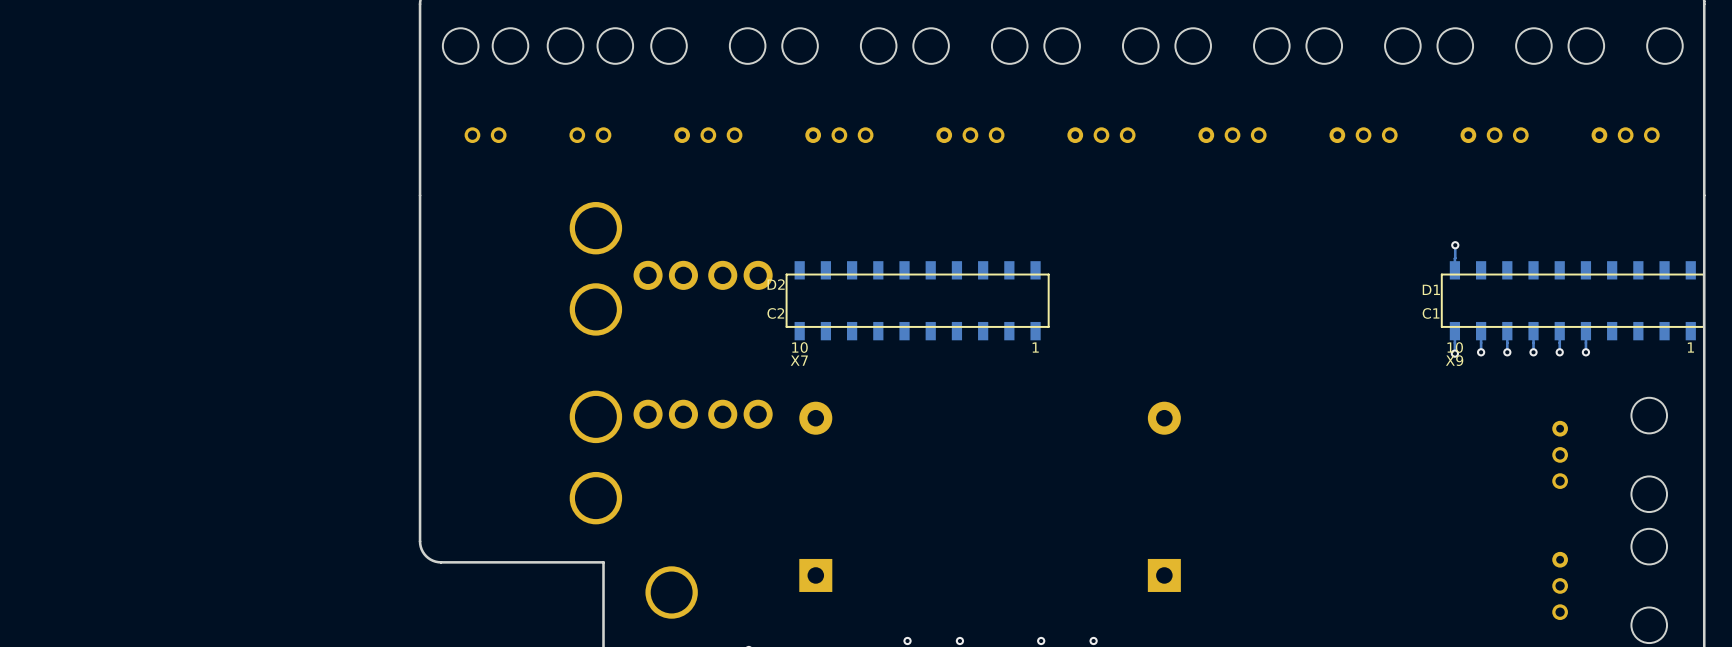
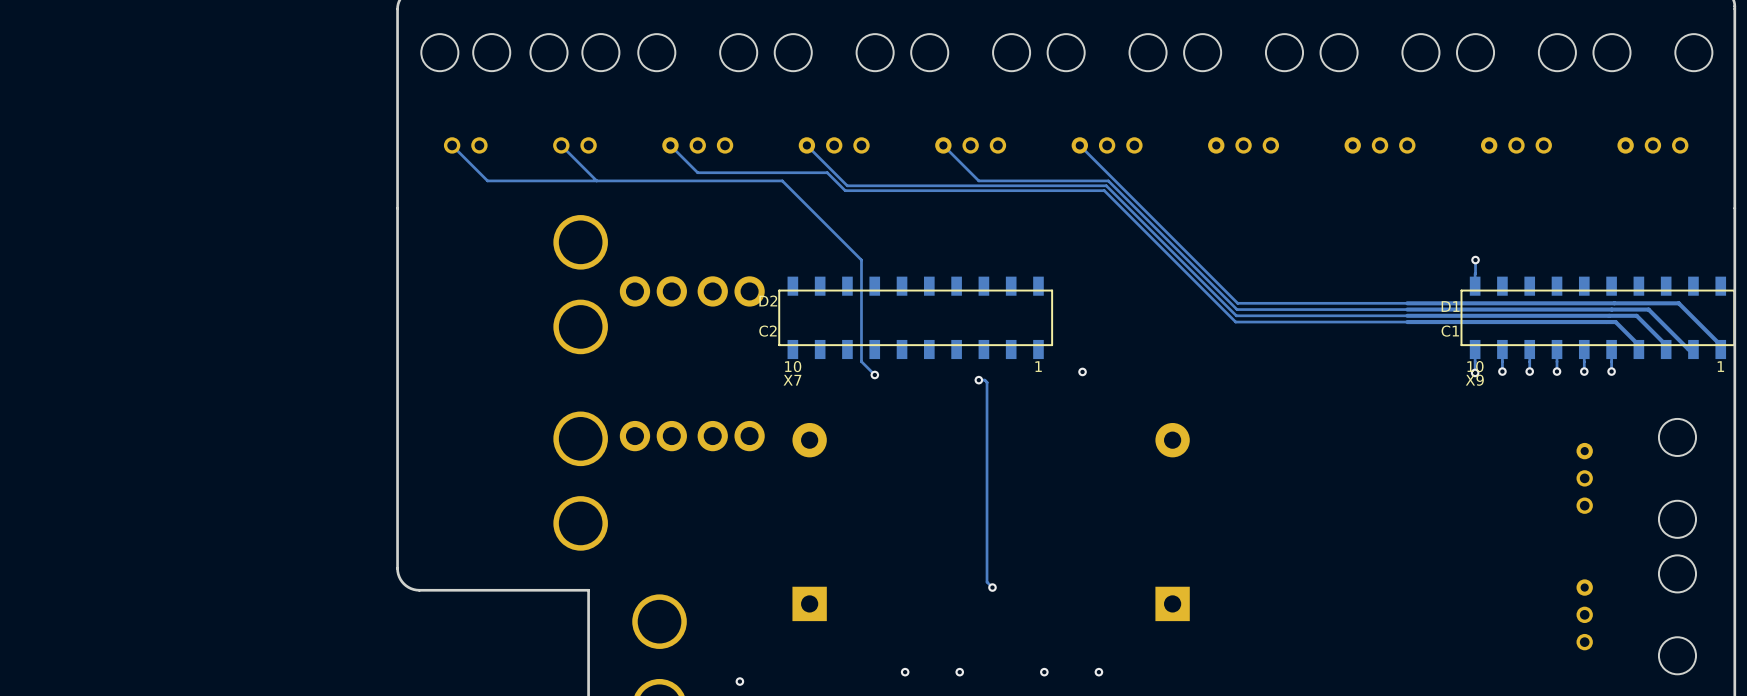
track: none -> (452, 145) (487, 180) (782, 180) (861, 260) (861, 361) (874, 374)
track: none -> (561, 145) (596, 180)
track: none -> (670, 145) (697, 172) (827, 172) (845, 190) (1104, 190) (1235, 322) (1615, 322) (1638, 345) (1638, 349)
track: none -> (806, 145) (847, 185) (1106, 185) (1236, 315) (1636, 315) (1666, 345) (1666, 349)
track: none -> (943, 145) (978, 180) (1108, 180) (1237, 309) (1648, 309) (1688, 349) (1693, 349)
track: none -> (1079, 145) (1237, 303) (1678, 303) (1720, 345) (1720, 349)
via: none -> (1082, 371)
via: none -> (874, 374)
track: none -> (978, 380) (984, 380) (987, 382) (987, 582) (992, 587)
via: none -> (978, 380)
via: none -> (992, 587)

